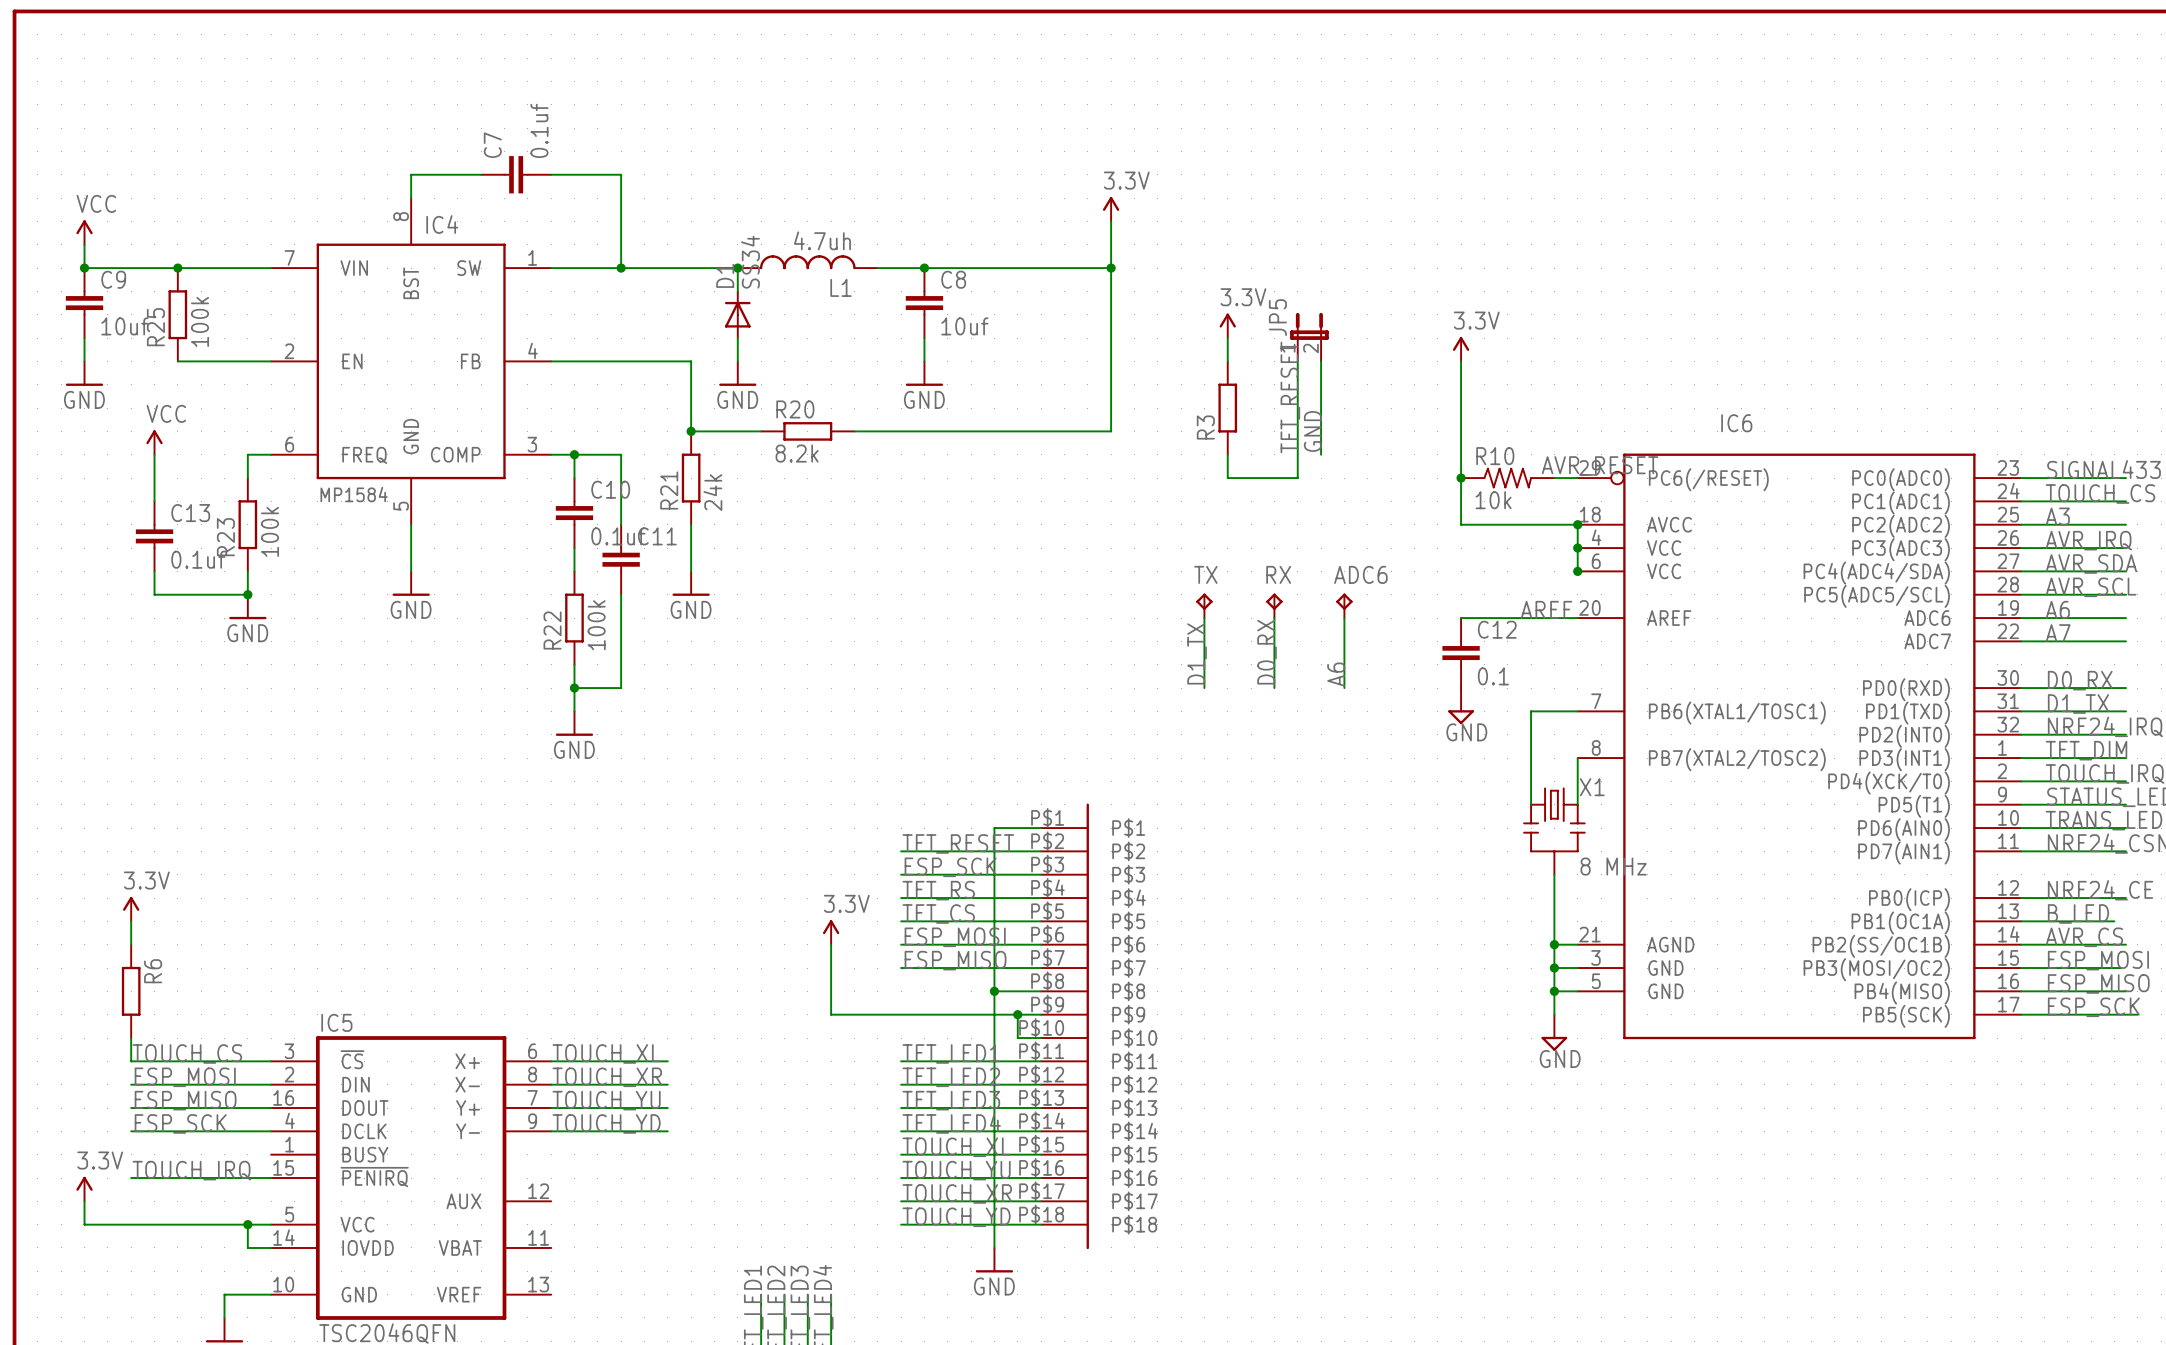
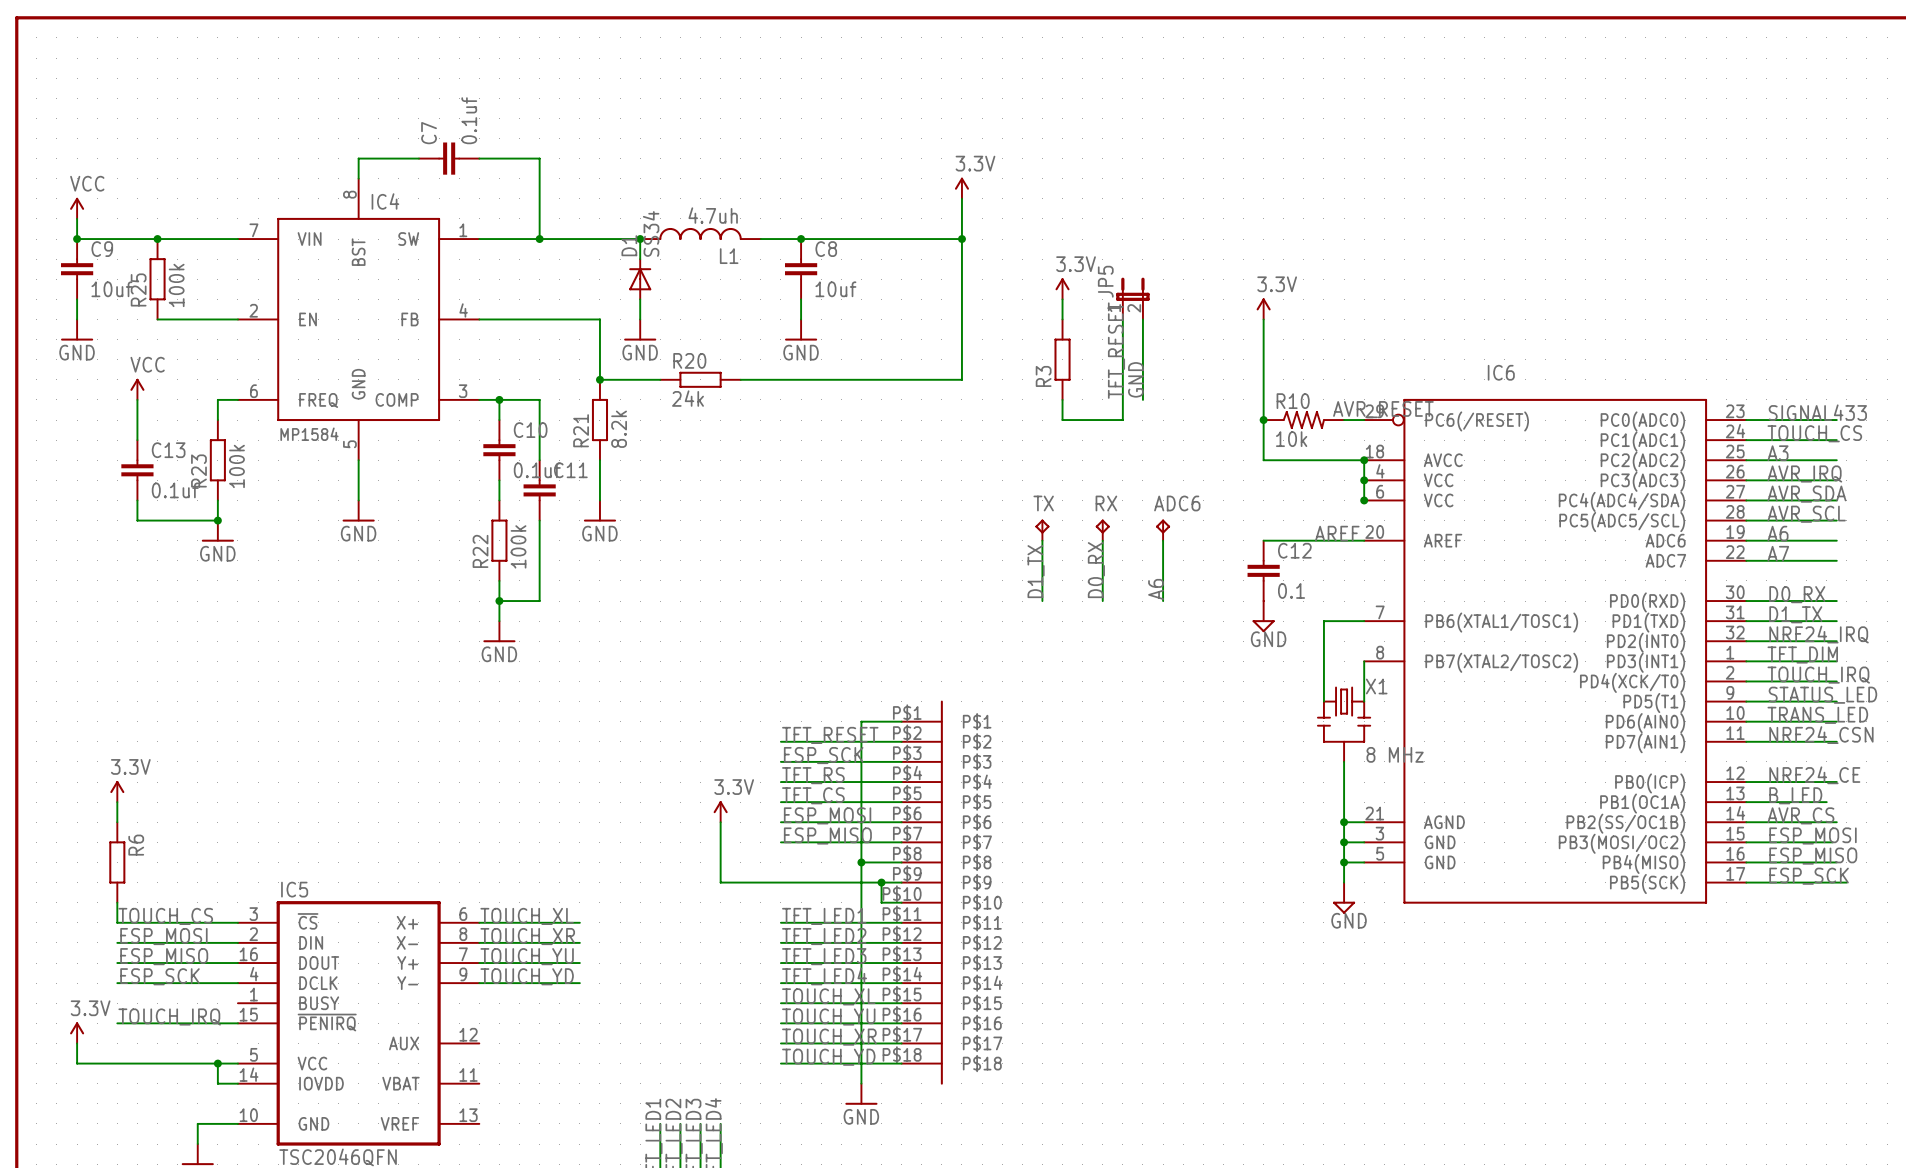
R20 value: 8.2k (797, 453) -> 24k (688, 398)
R21 value: 24k (712, 492) -> 8.2k (619, 429)

